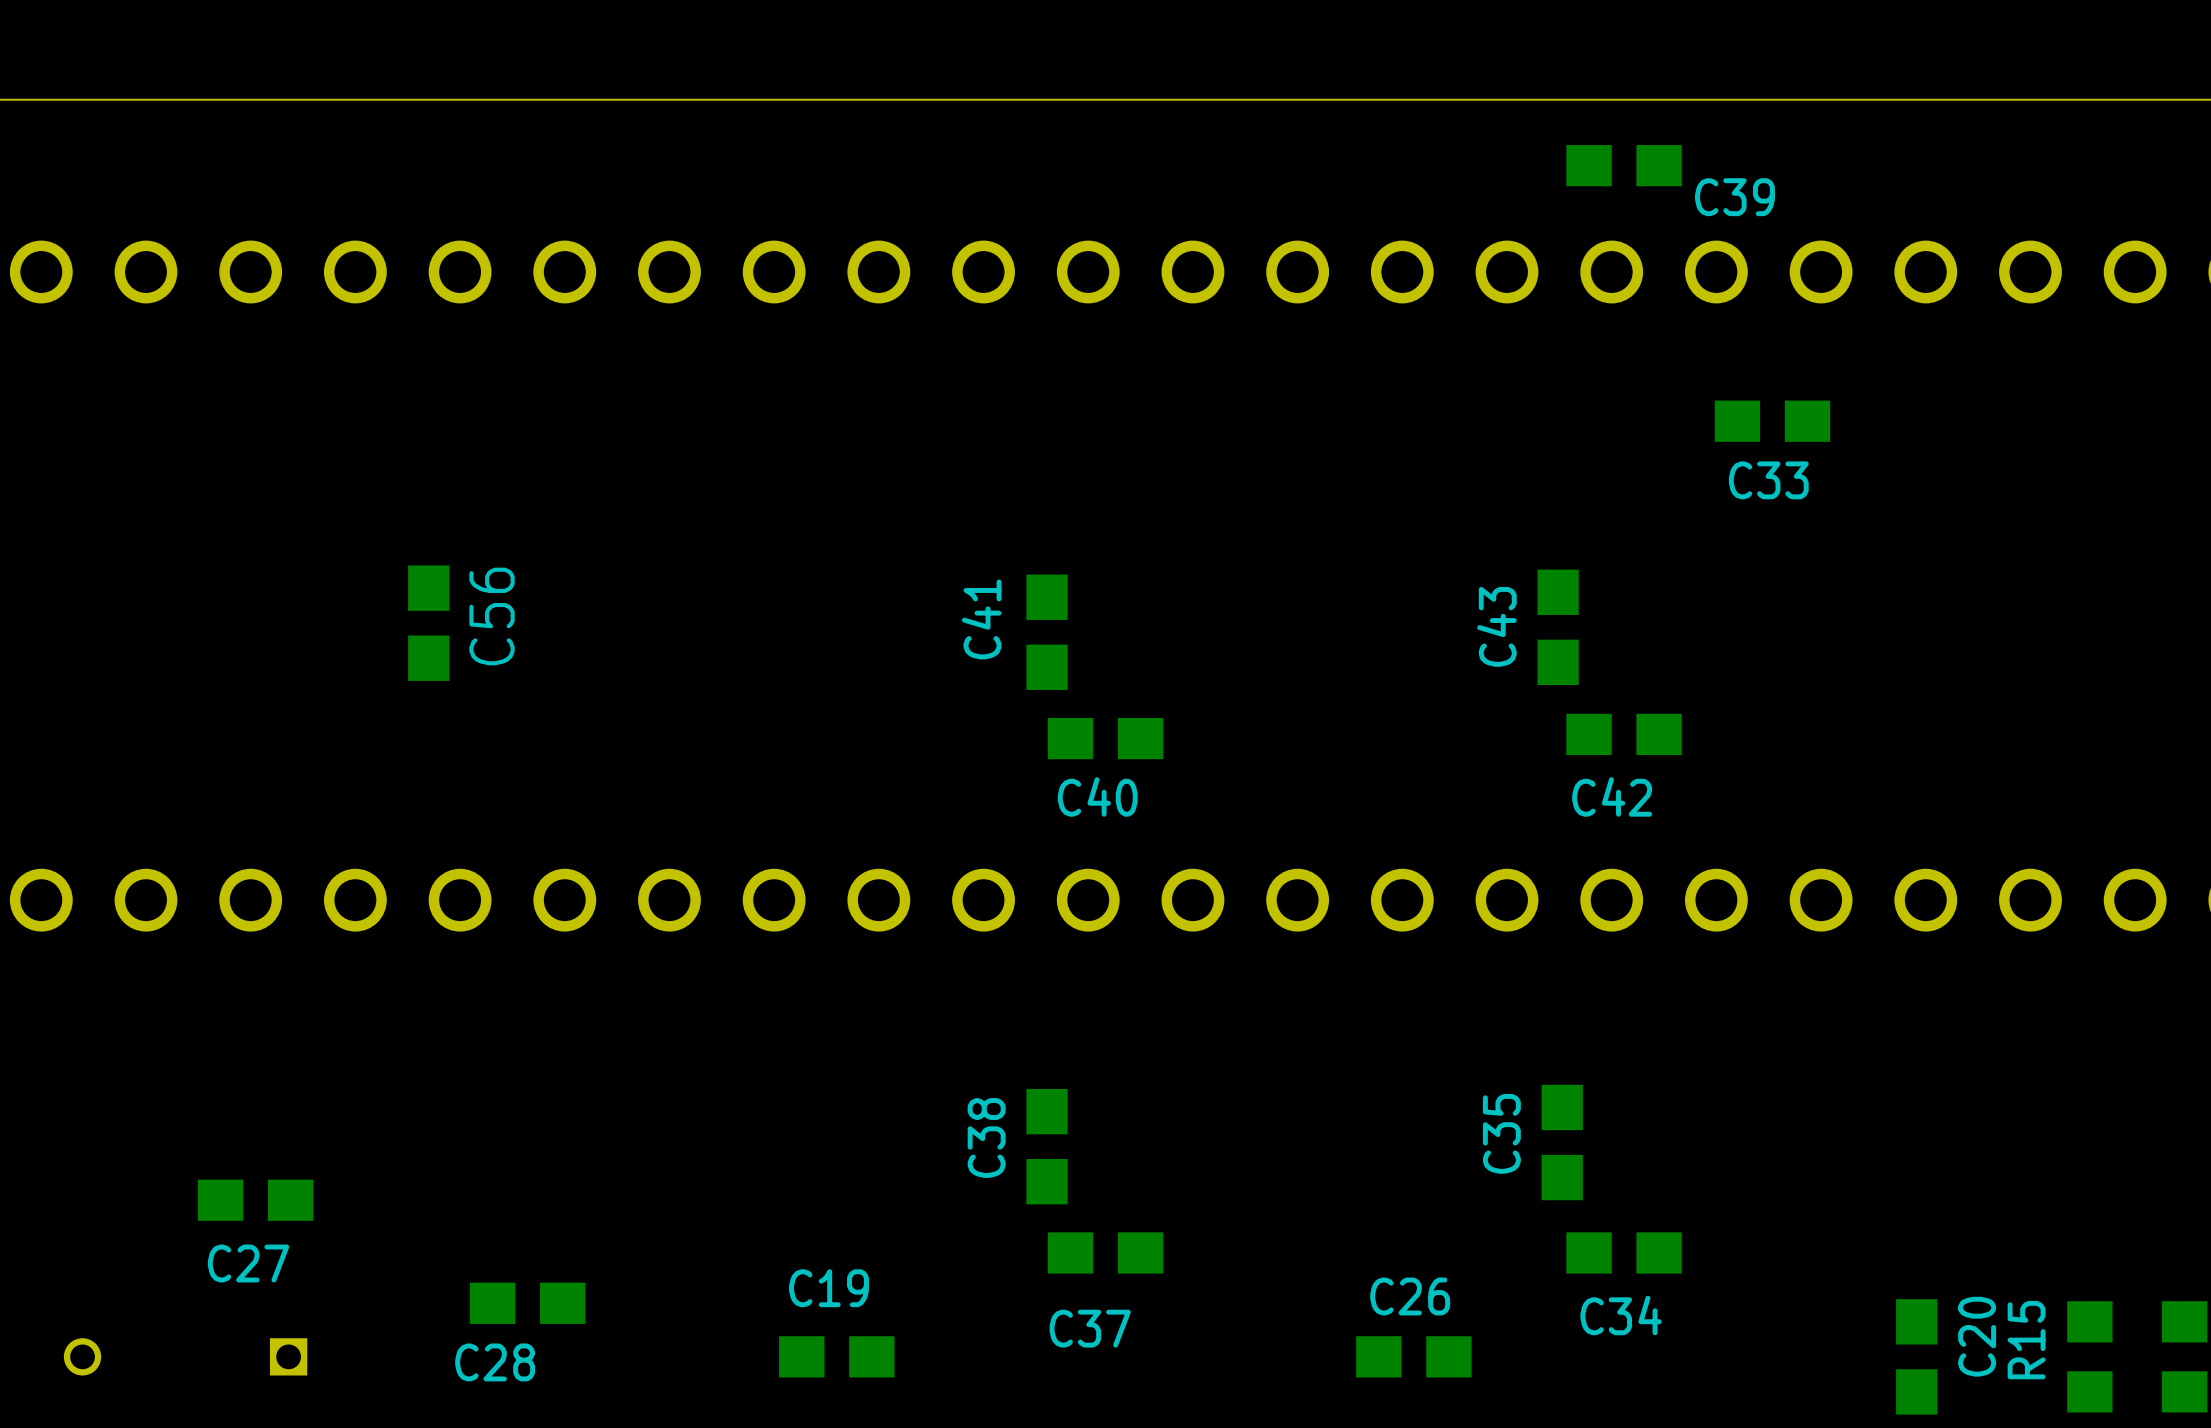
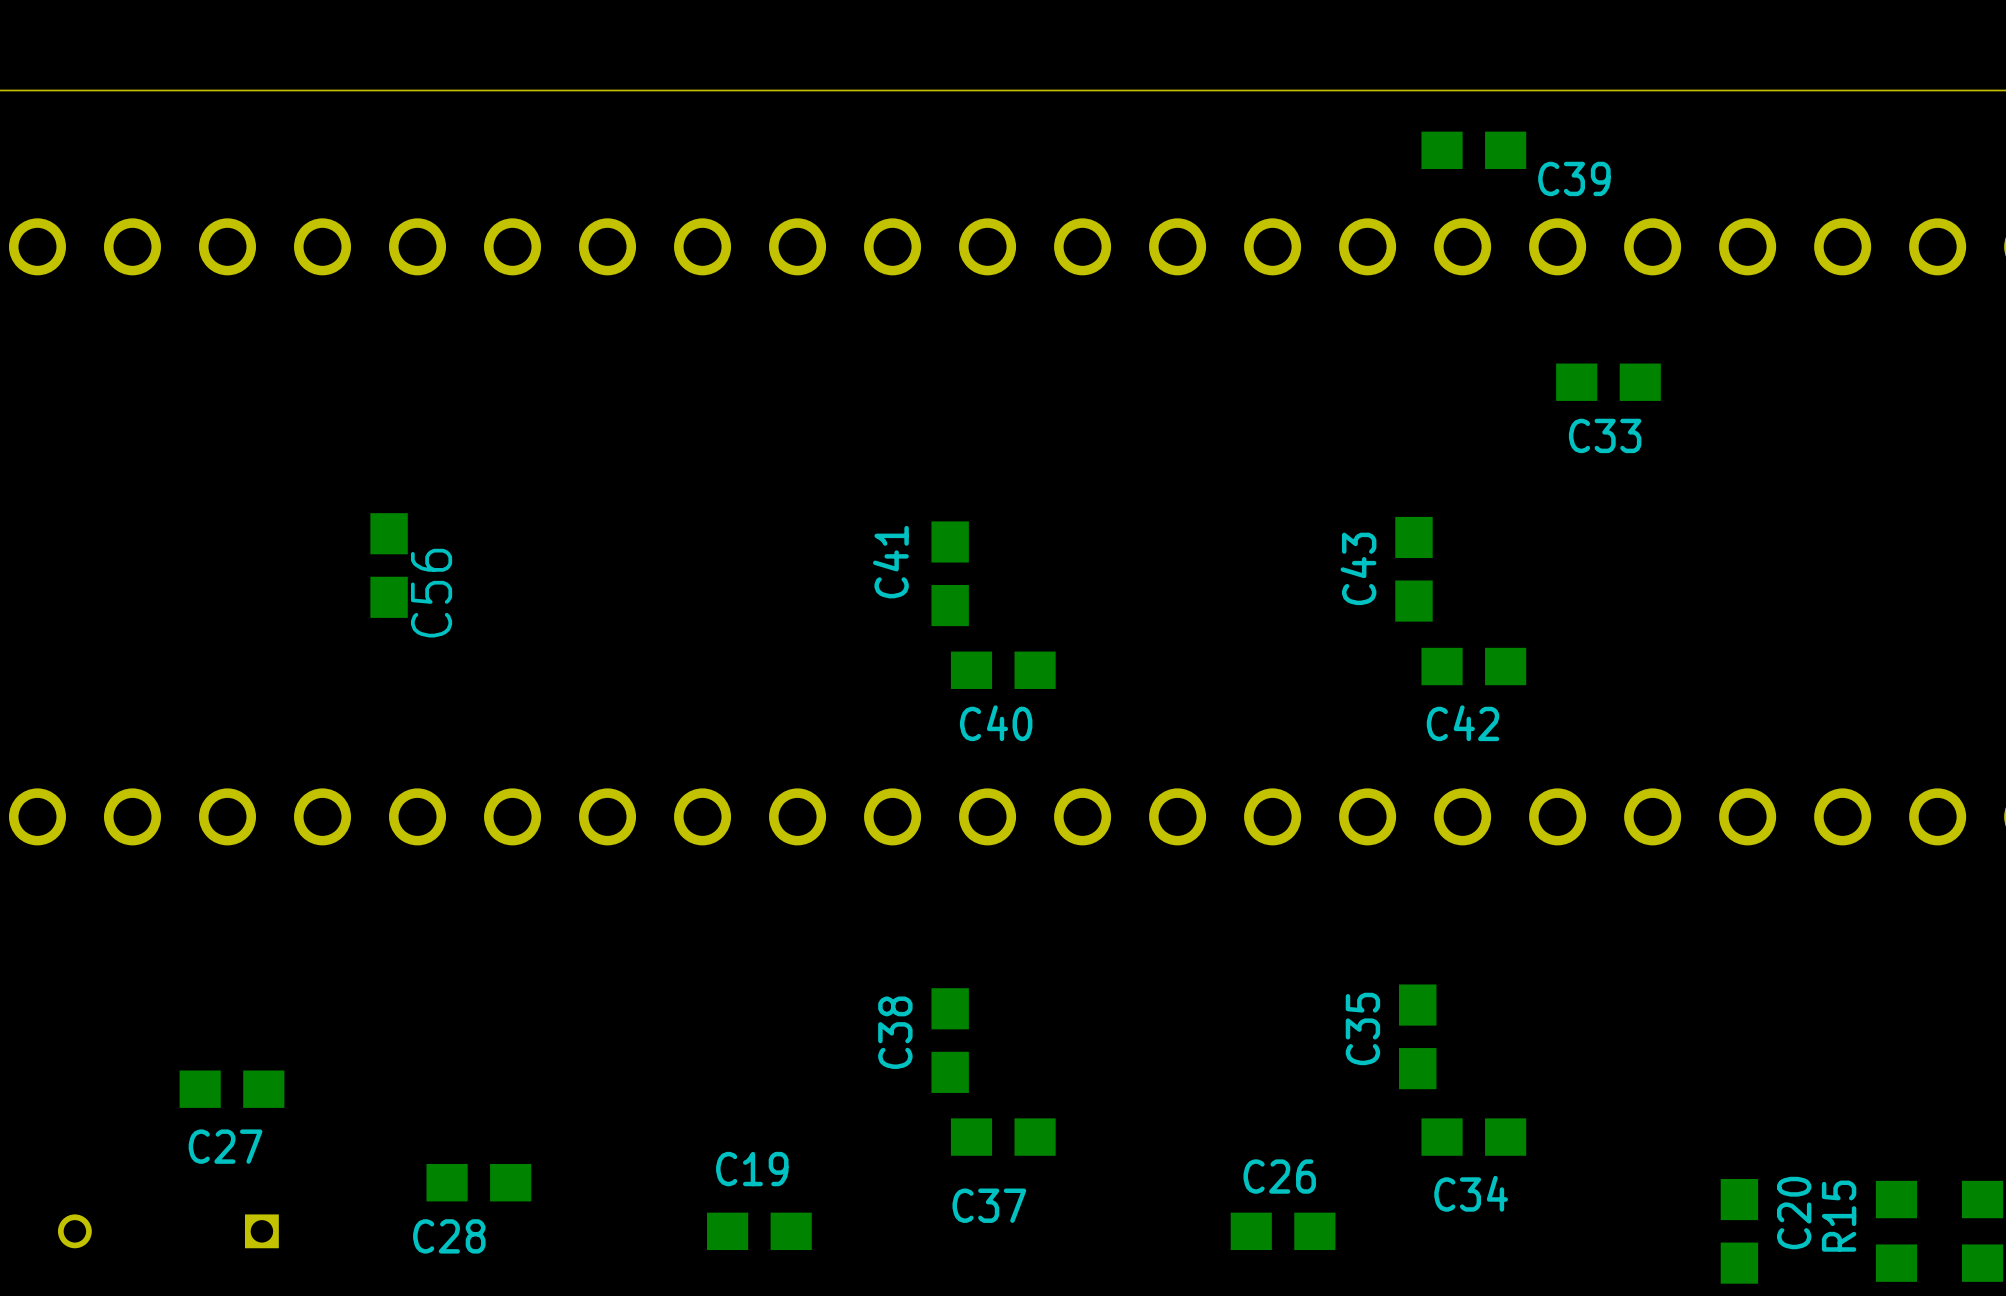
C56 name position: C56 (492, 616) -> C56 (431, 593)

